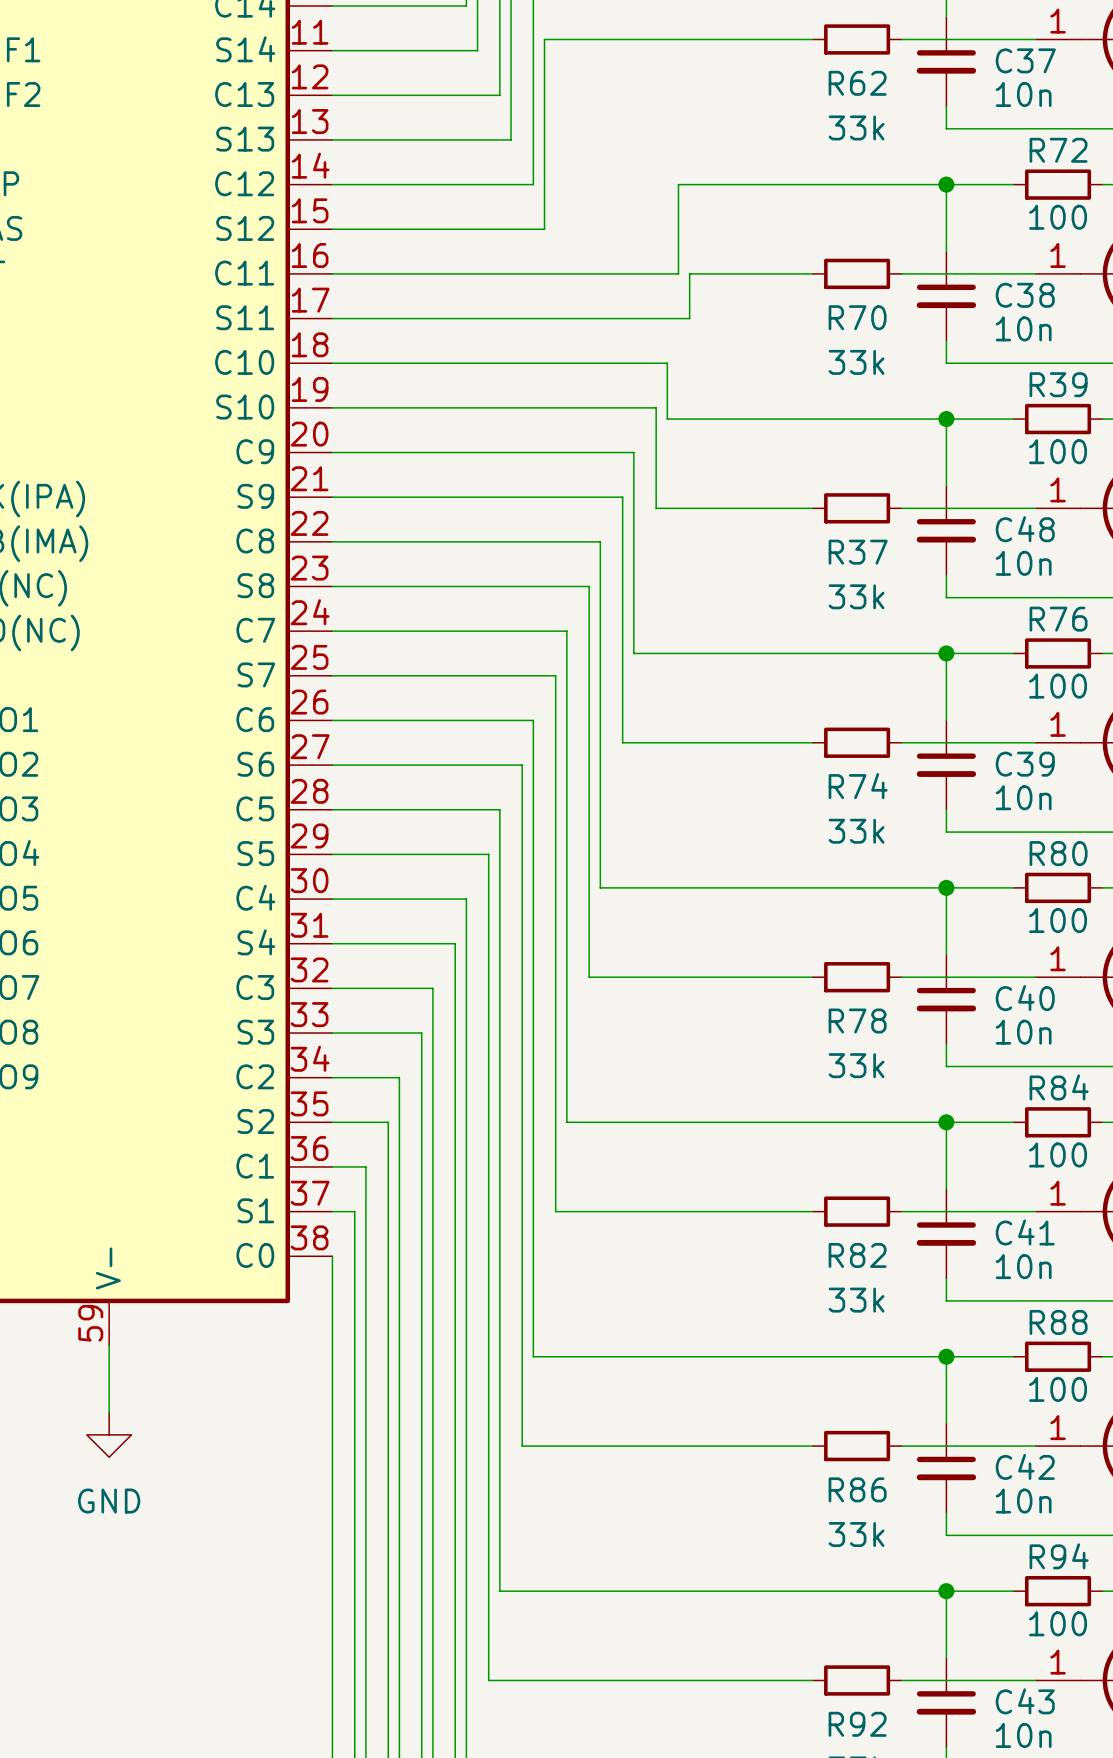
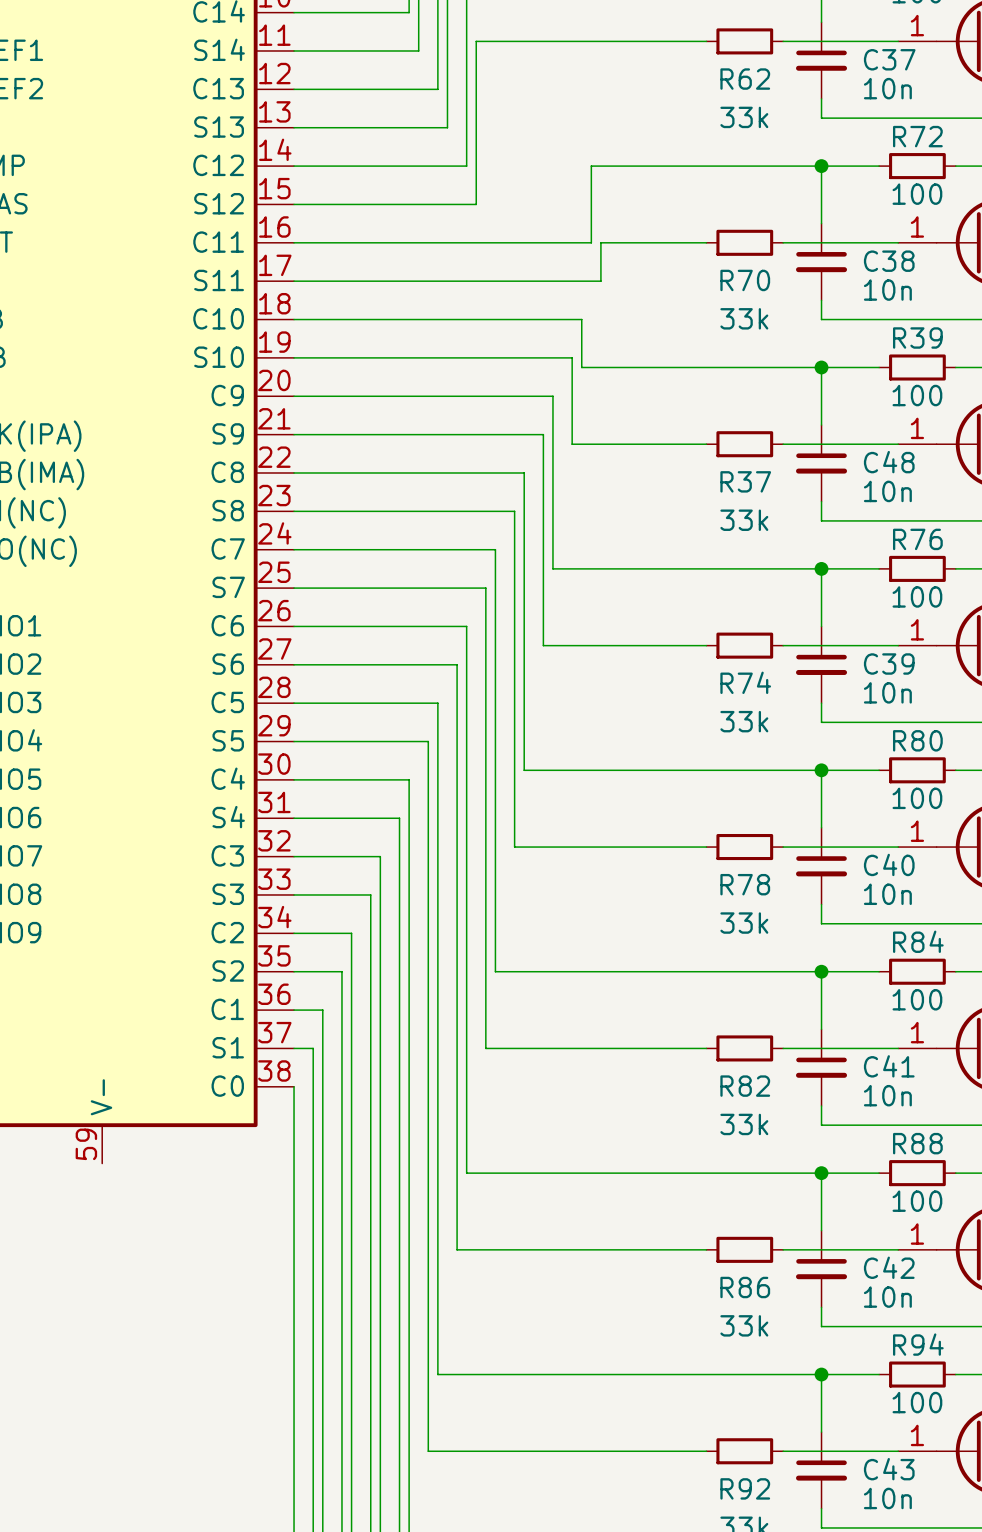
wire: (109, 1345) (109, 1412) -> none
power symbol: GND (109, 1434) -> none

